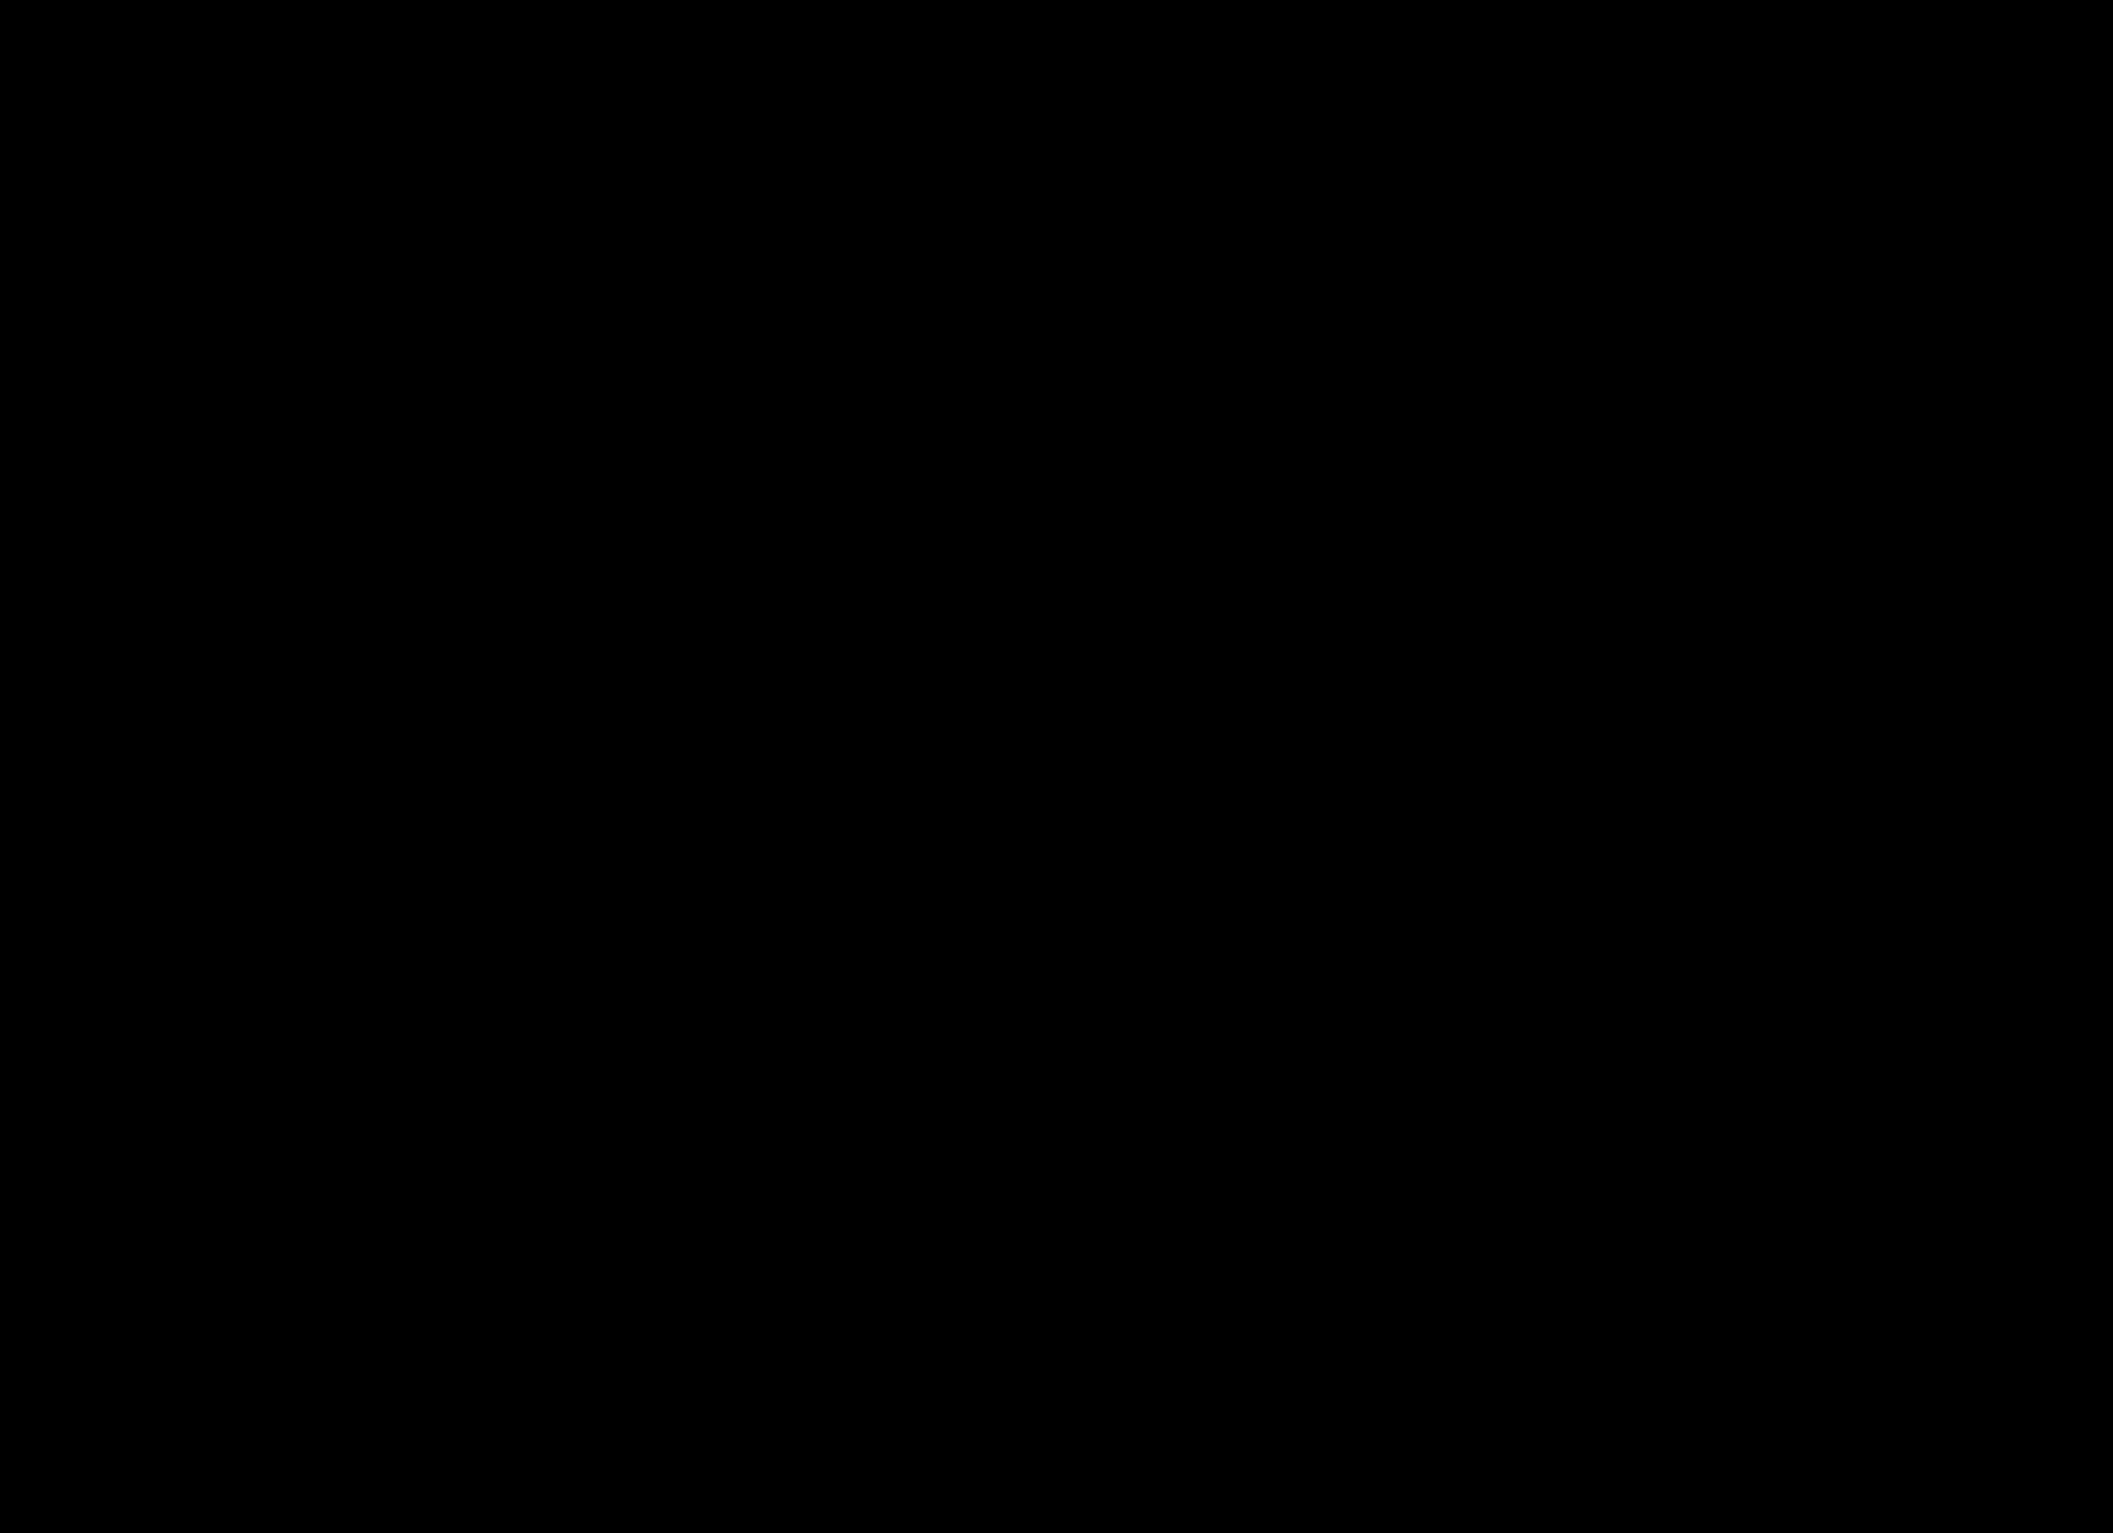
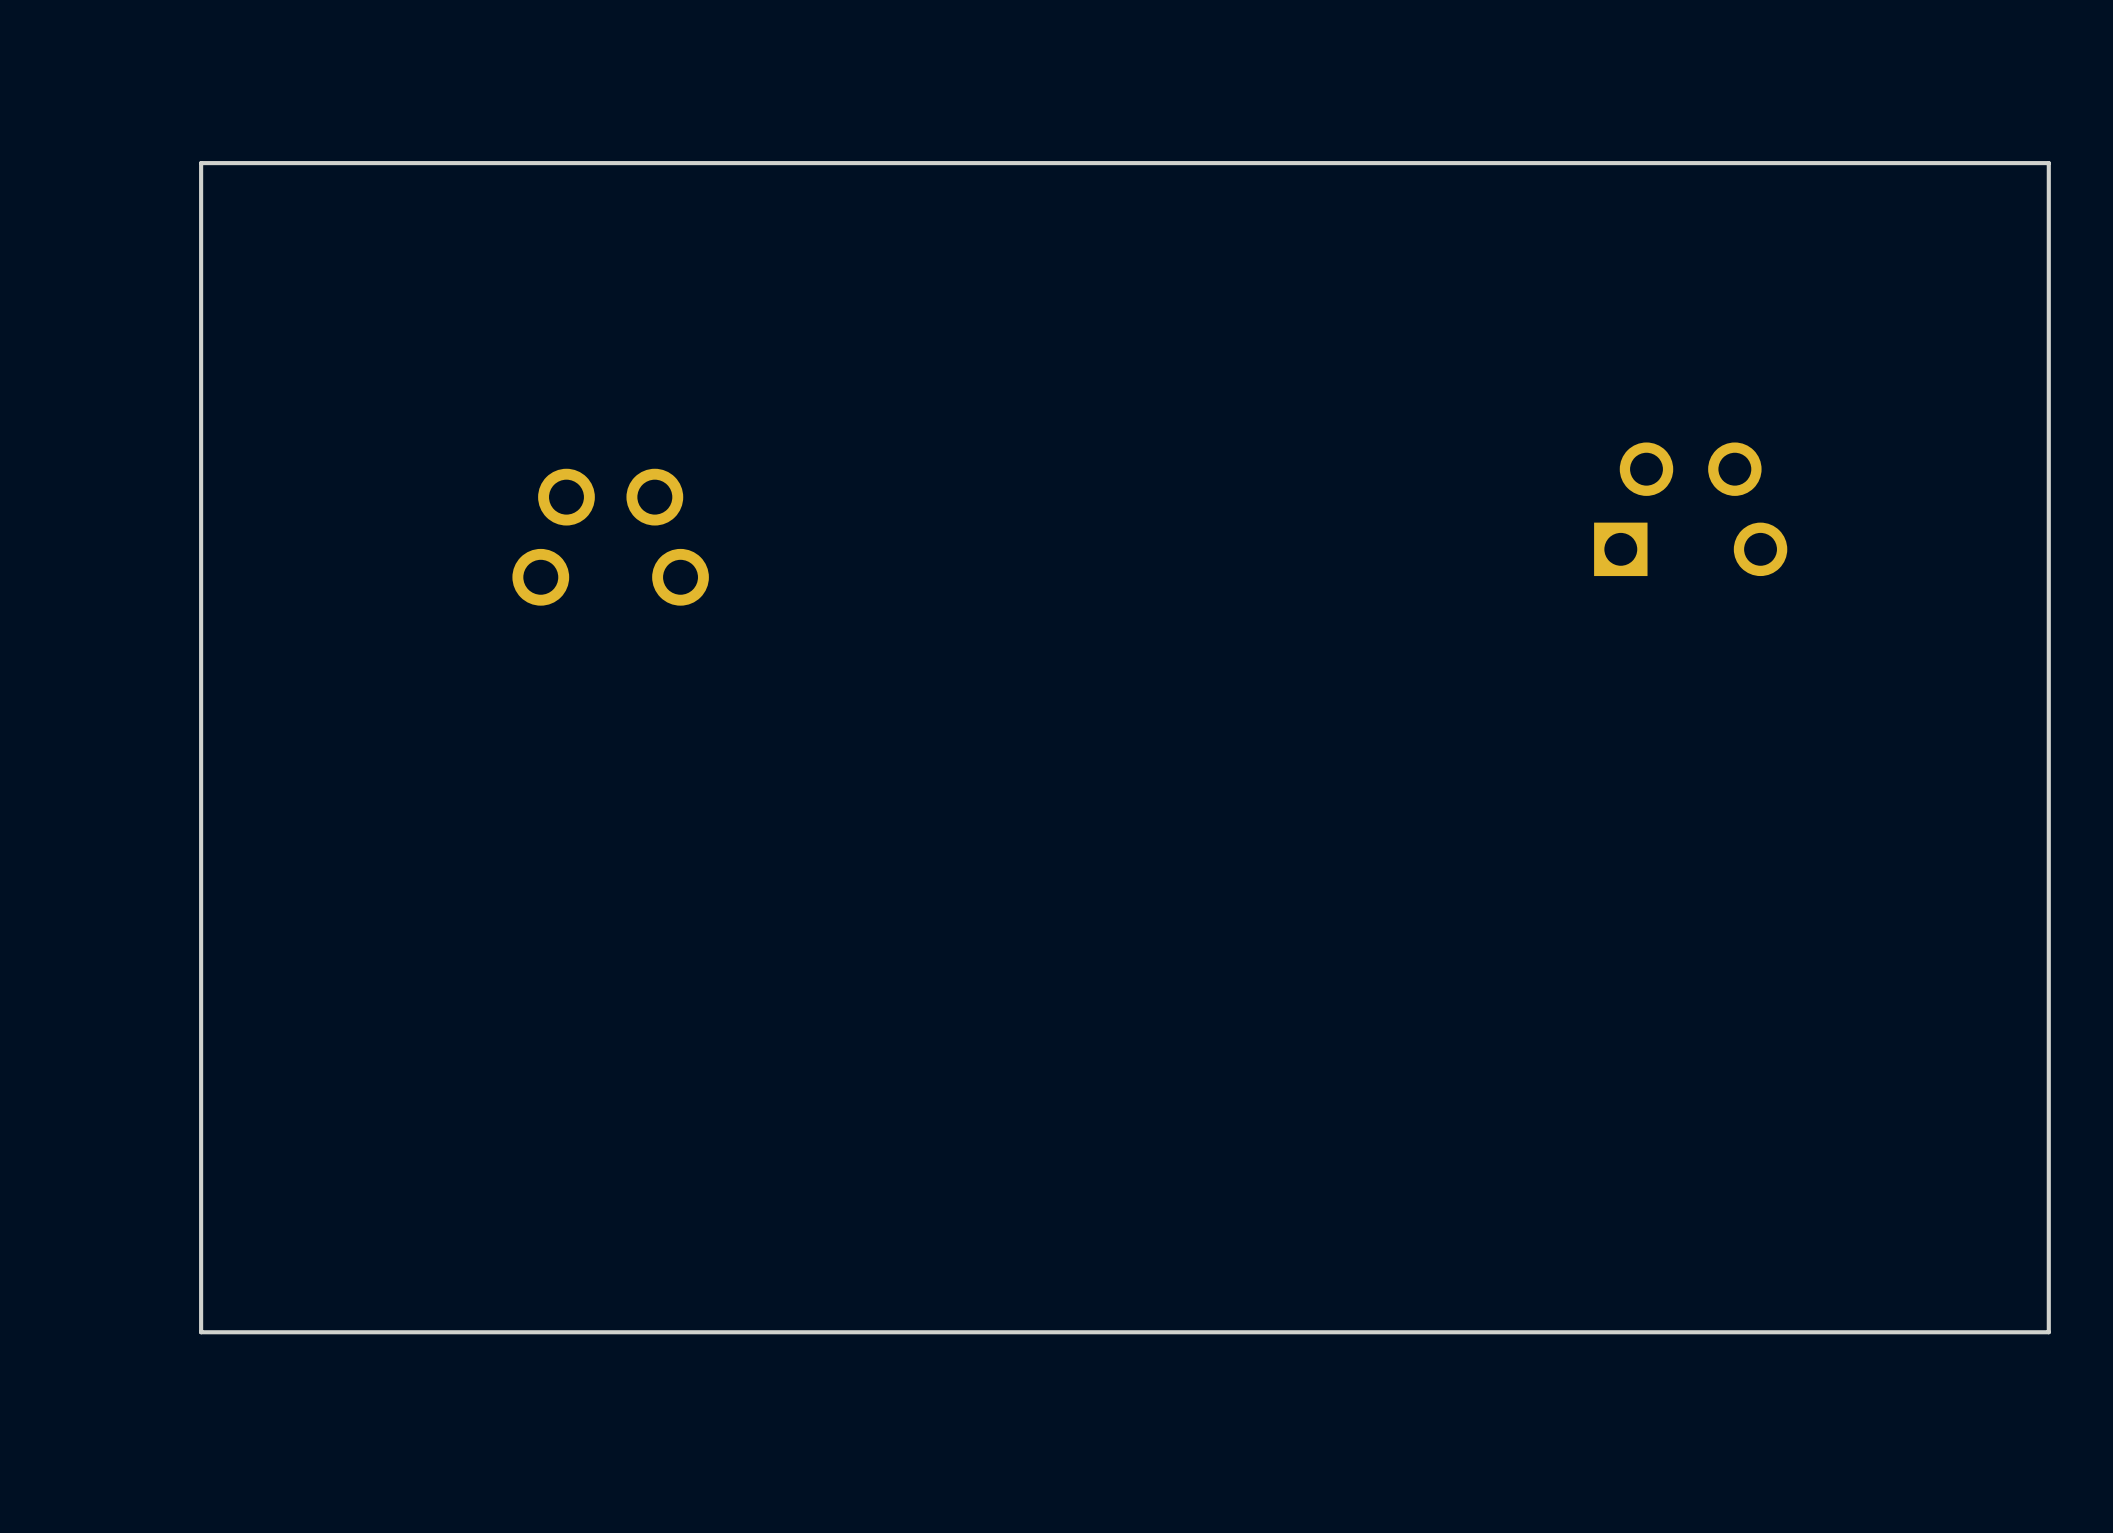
board edge: none -> (2048, 163) (201, 163) (201, 1332) (2048, 1332) (2048, 163)
part: none -> (1690, 509)
part: none -> (610, 537)

